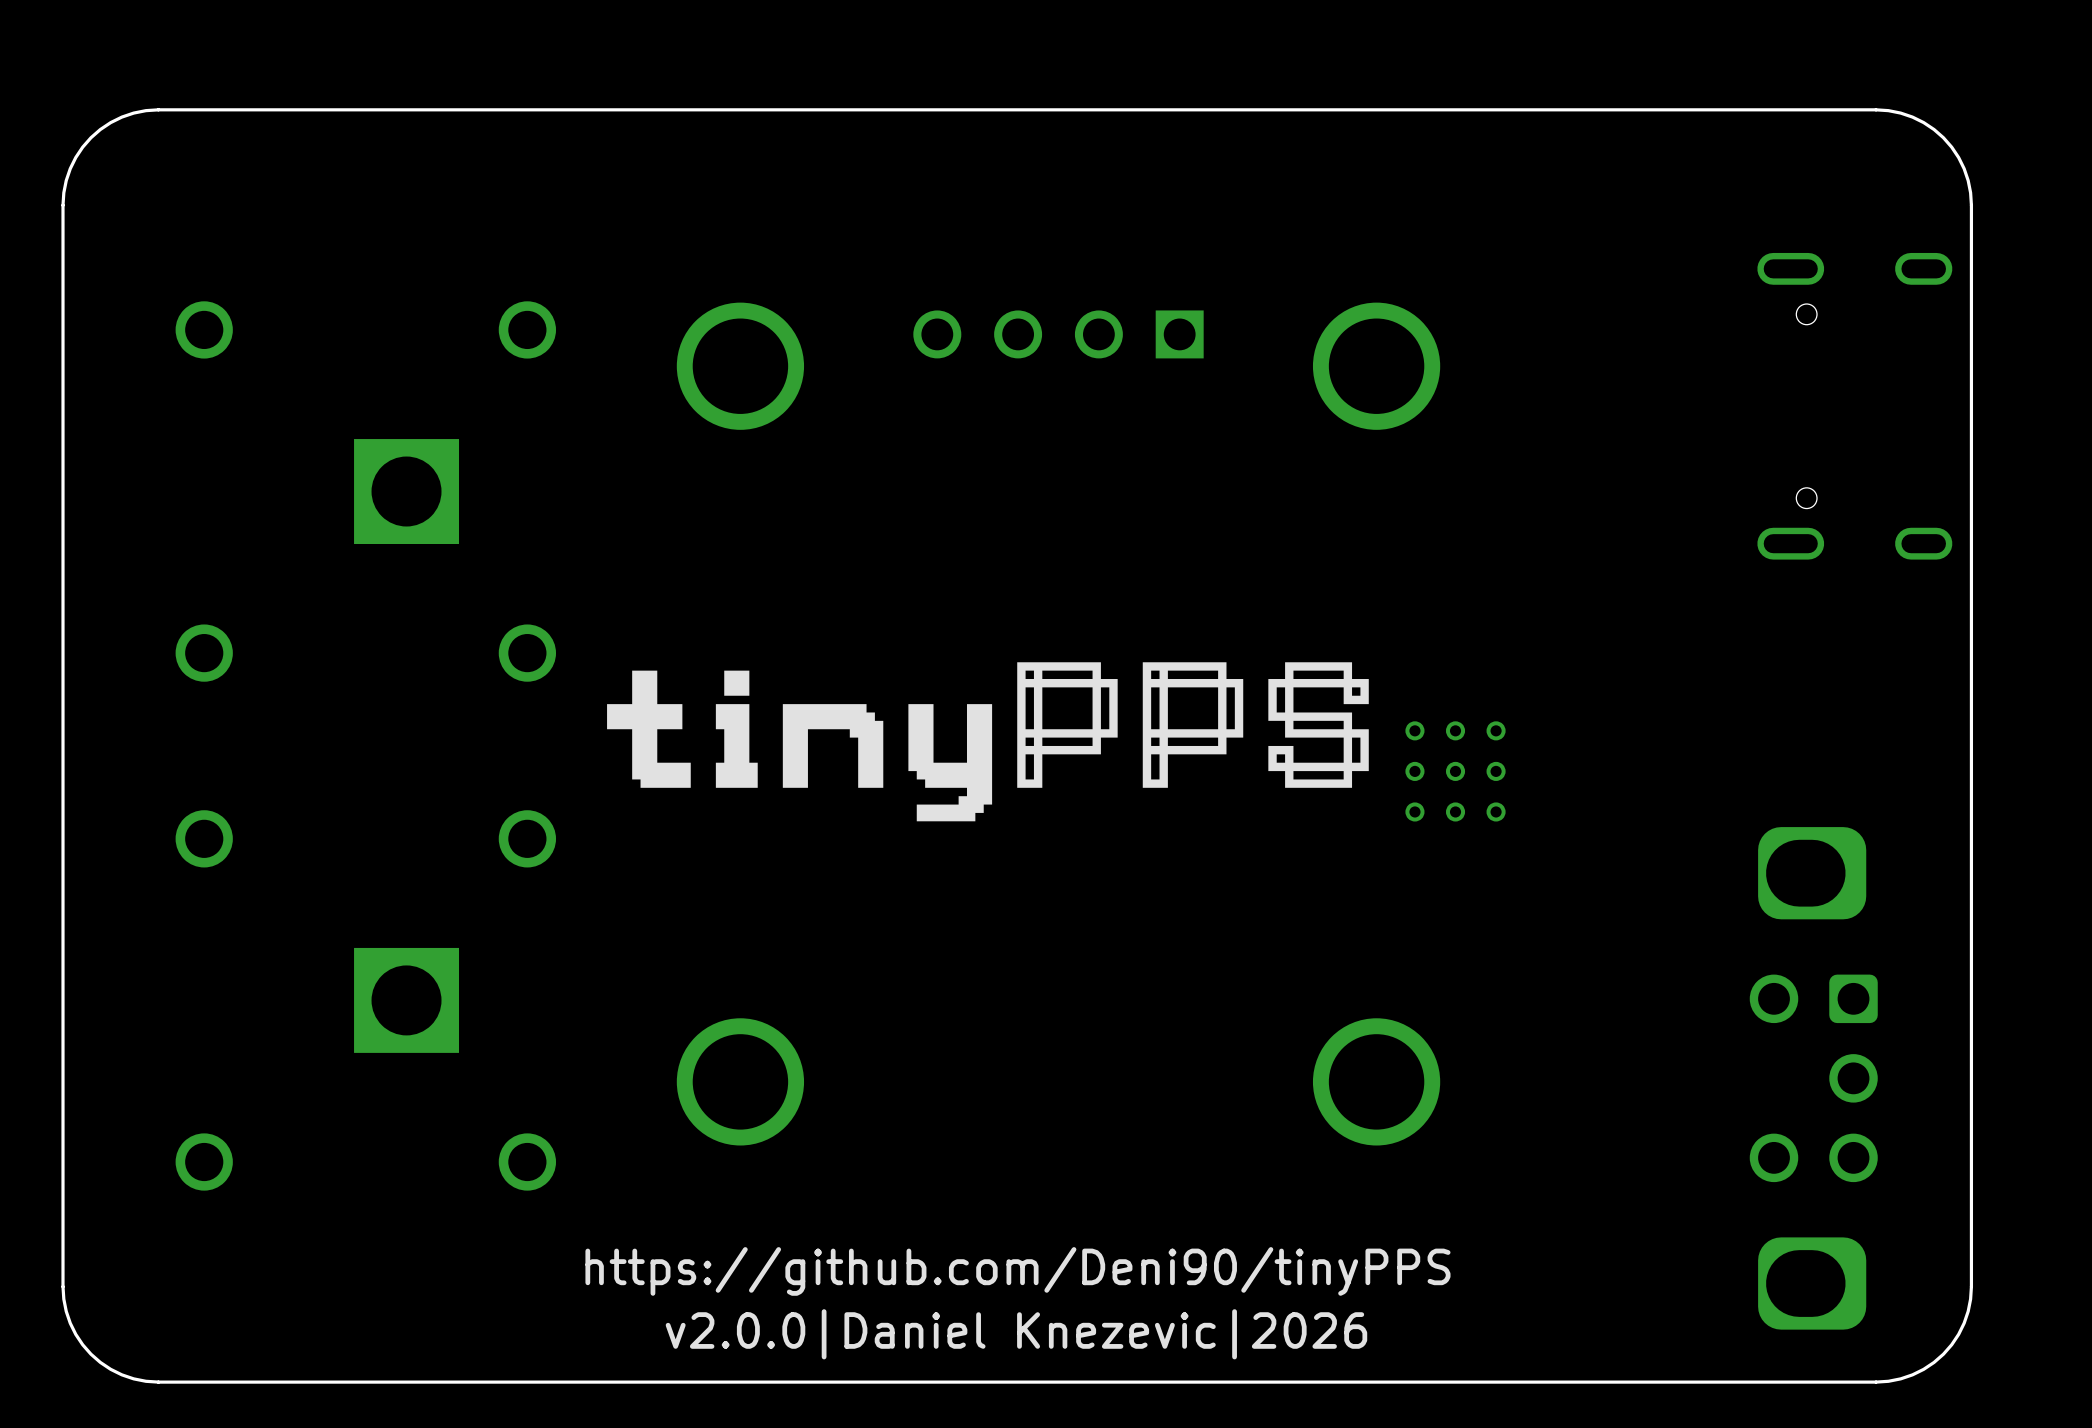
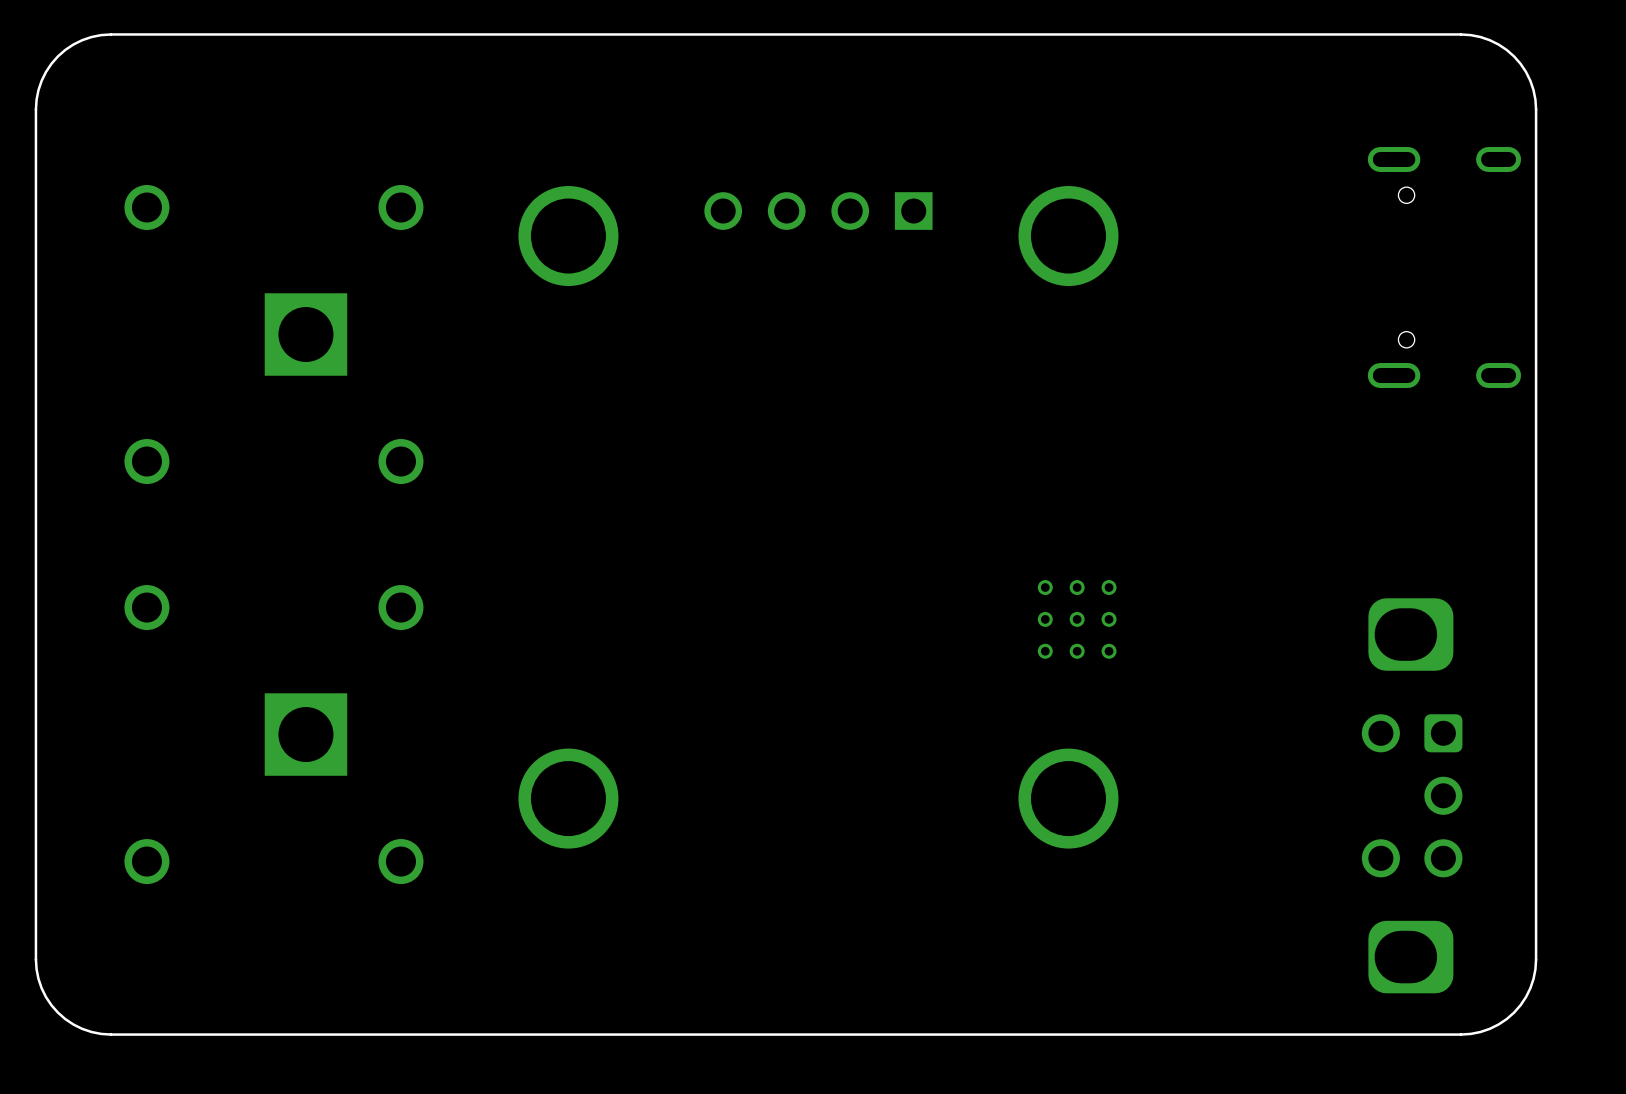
drawing: [607, 662, 1369, 822] -> none
part position: (1455, 771) -> (1077, 619)
text: https://github.com/Deni90/tinyPPS (1017, 1271) -> none
text: v2.0.0|Daniel Knezevic|2026 (1016, 1334) -> none

